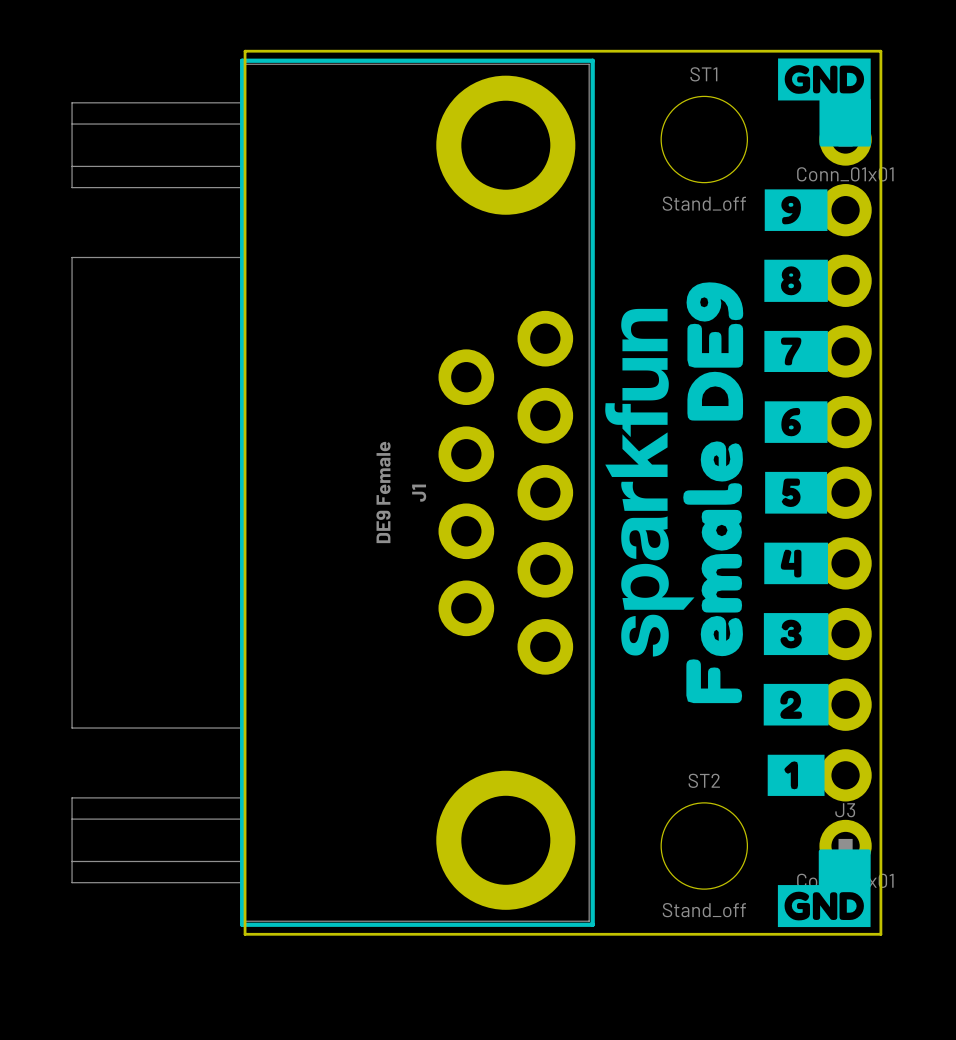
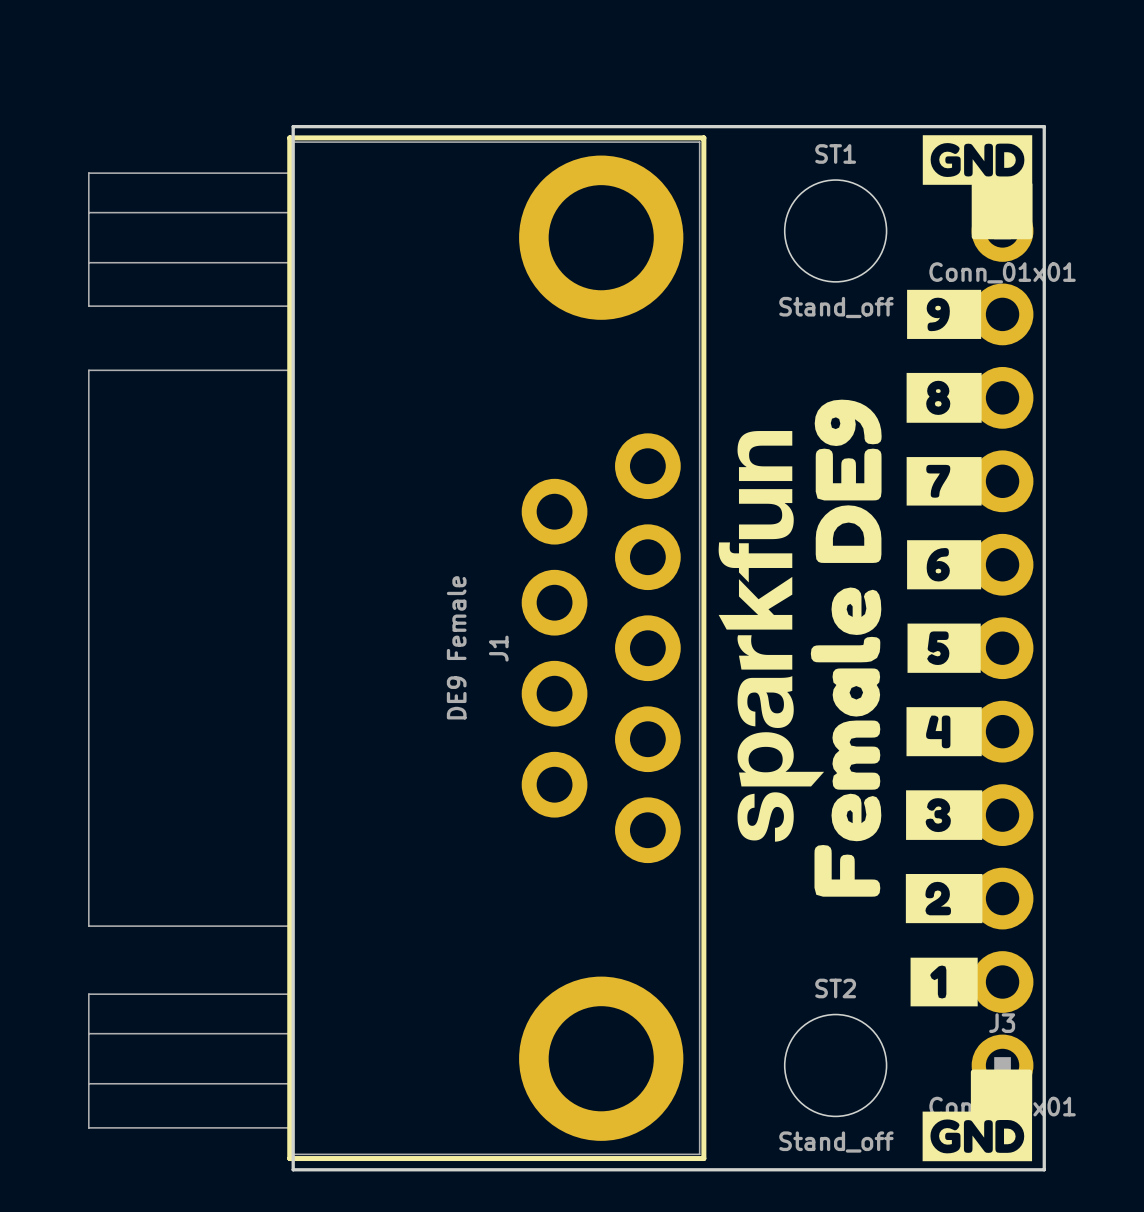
J1 footprint: [71, 58, 595, 927] -> [88, 135, 707, 1162]

